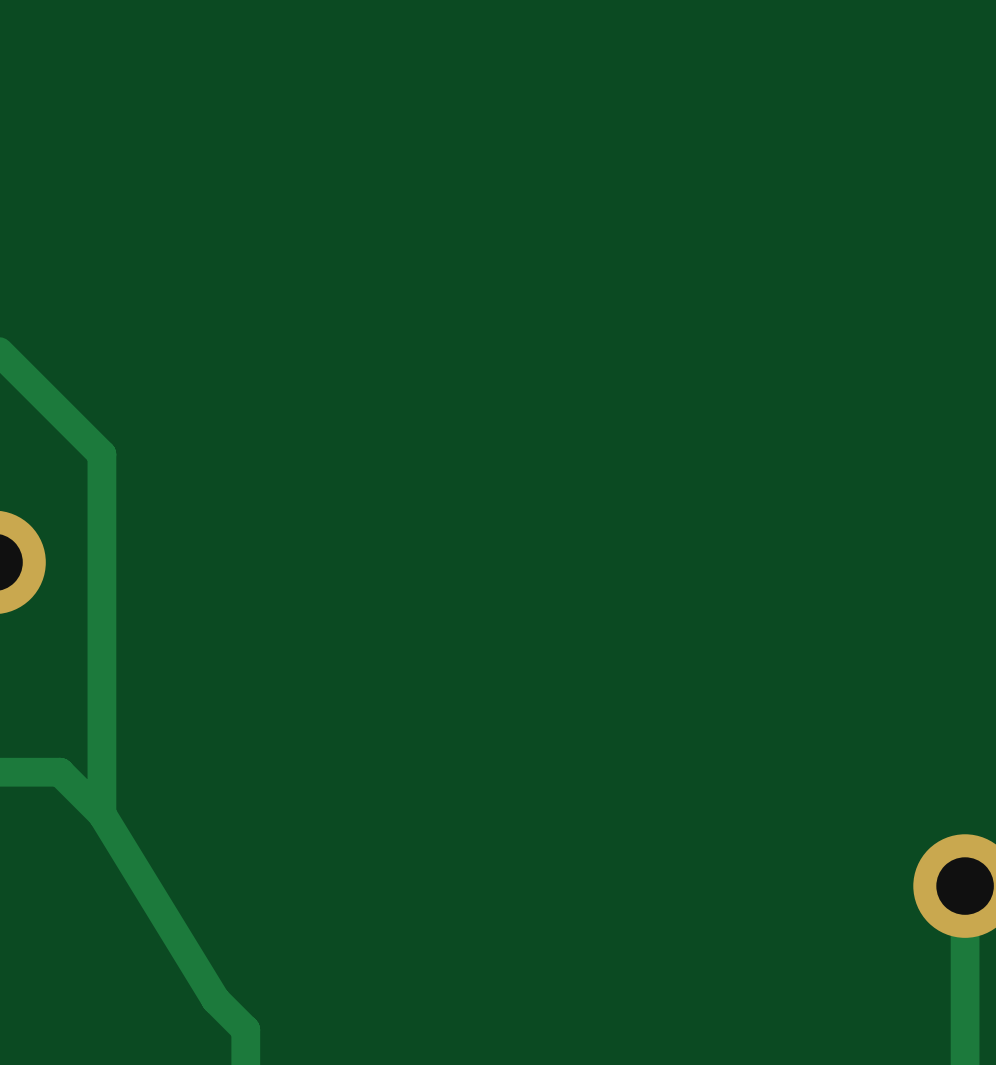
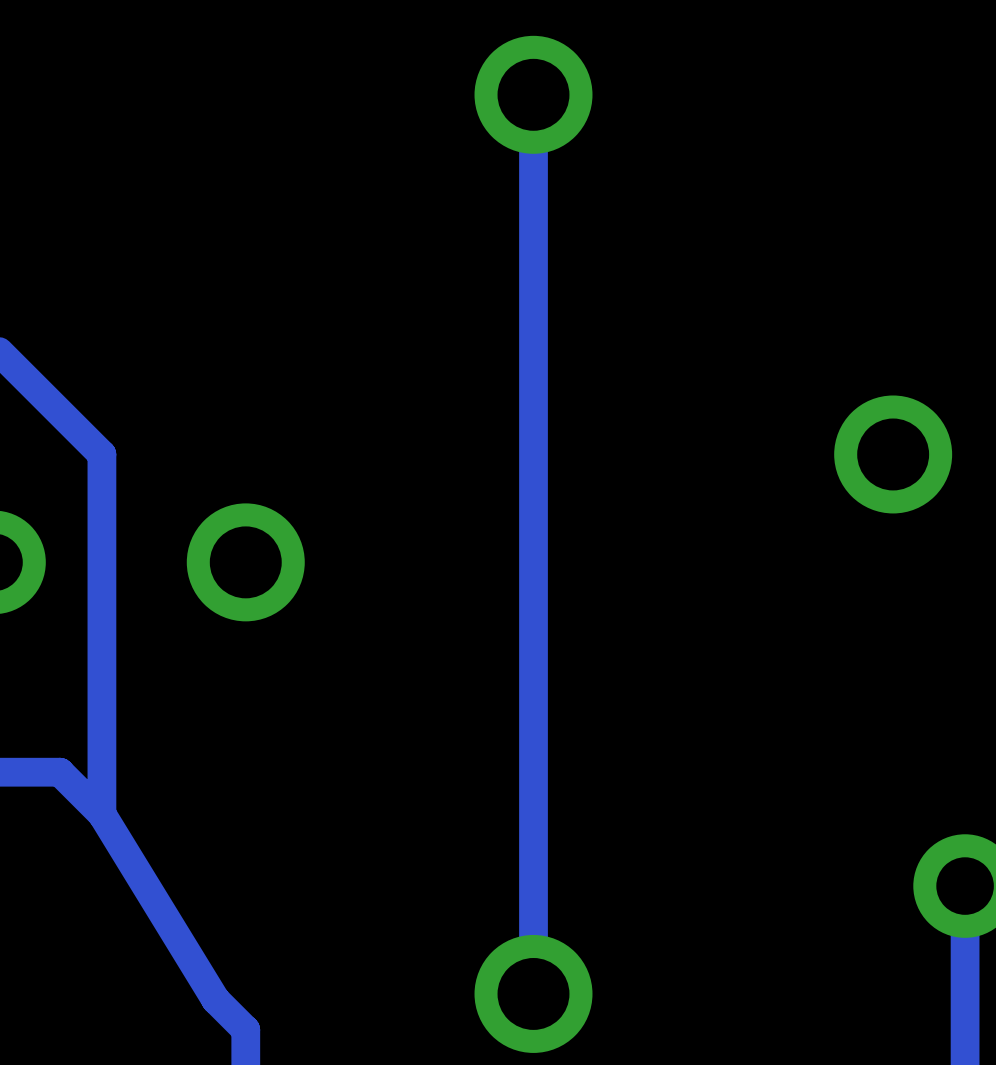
track: none -> (533, 94) (533, 993)
via: none -> (533, 94)
via: none -> (893, 454)
via: none -> (245, 562)
via: none -> (533, 993)

